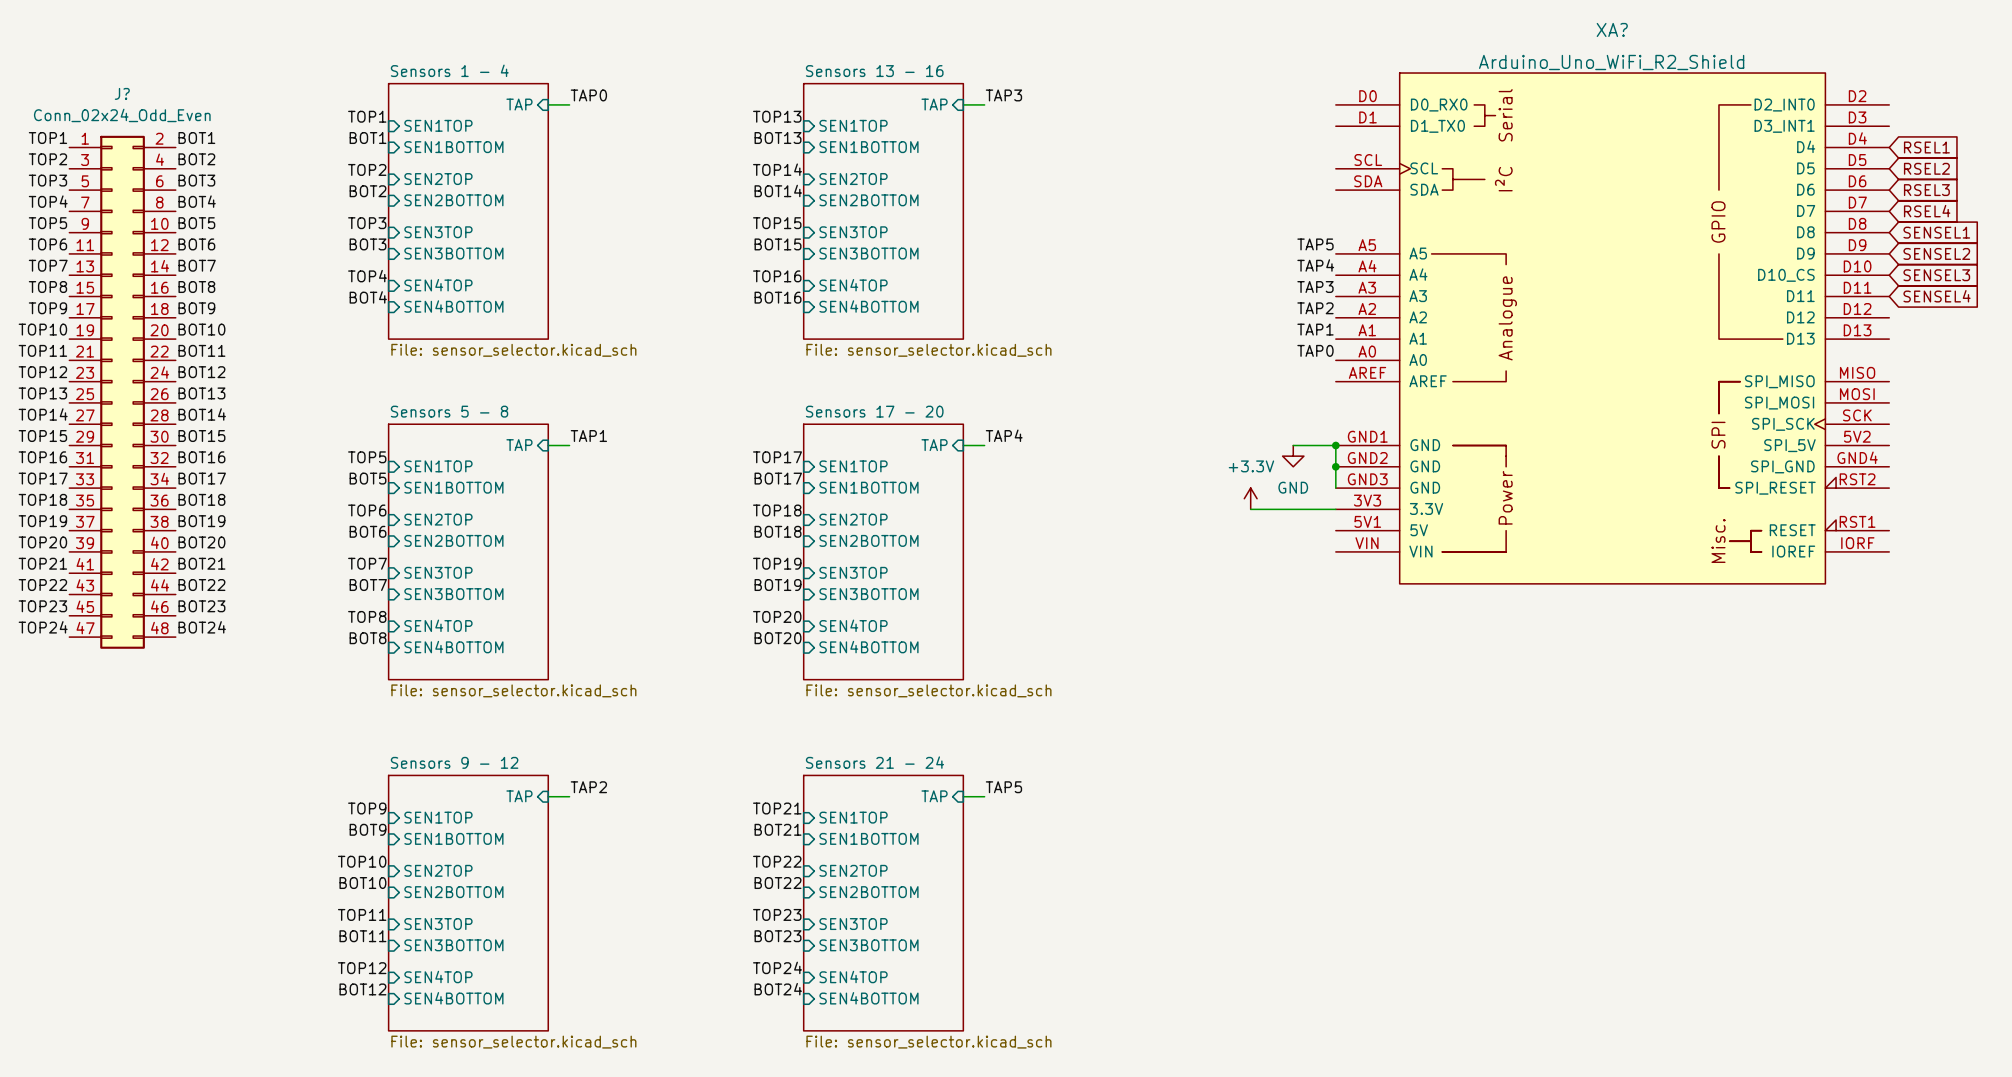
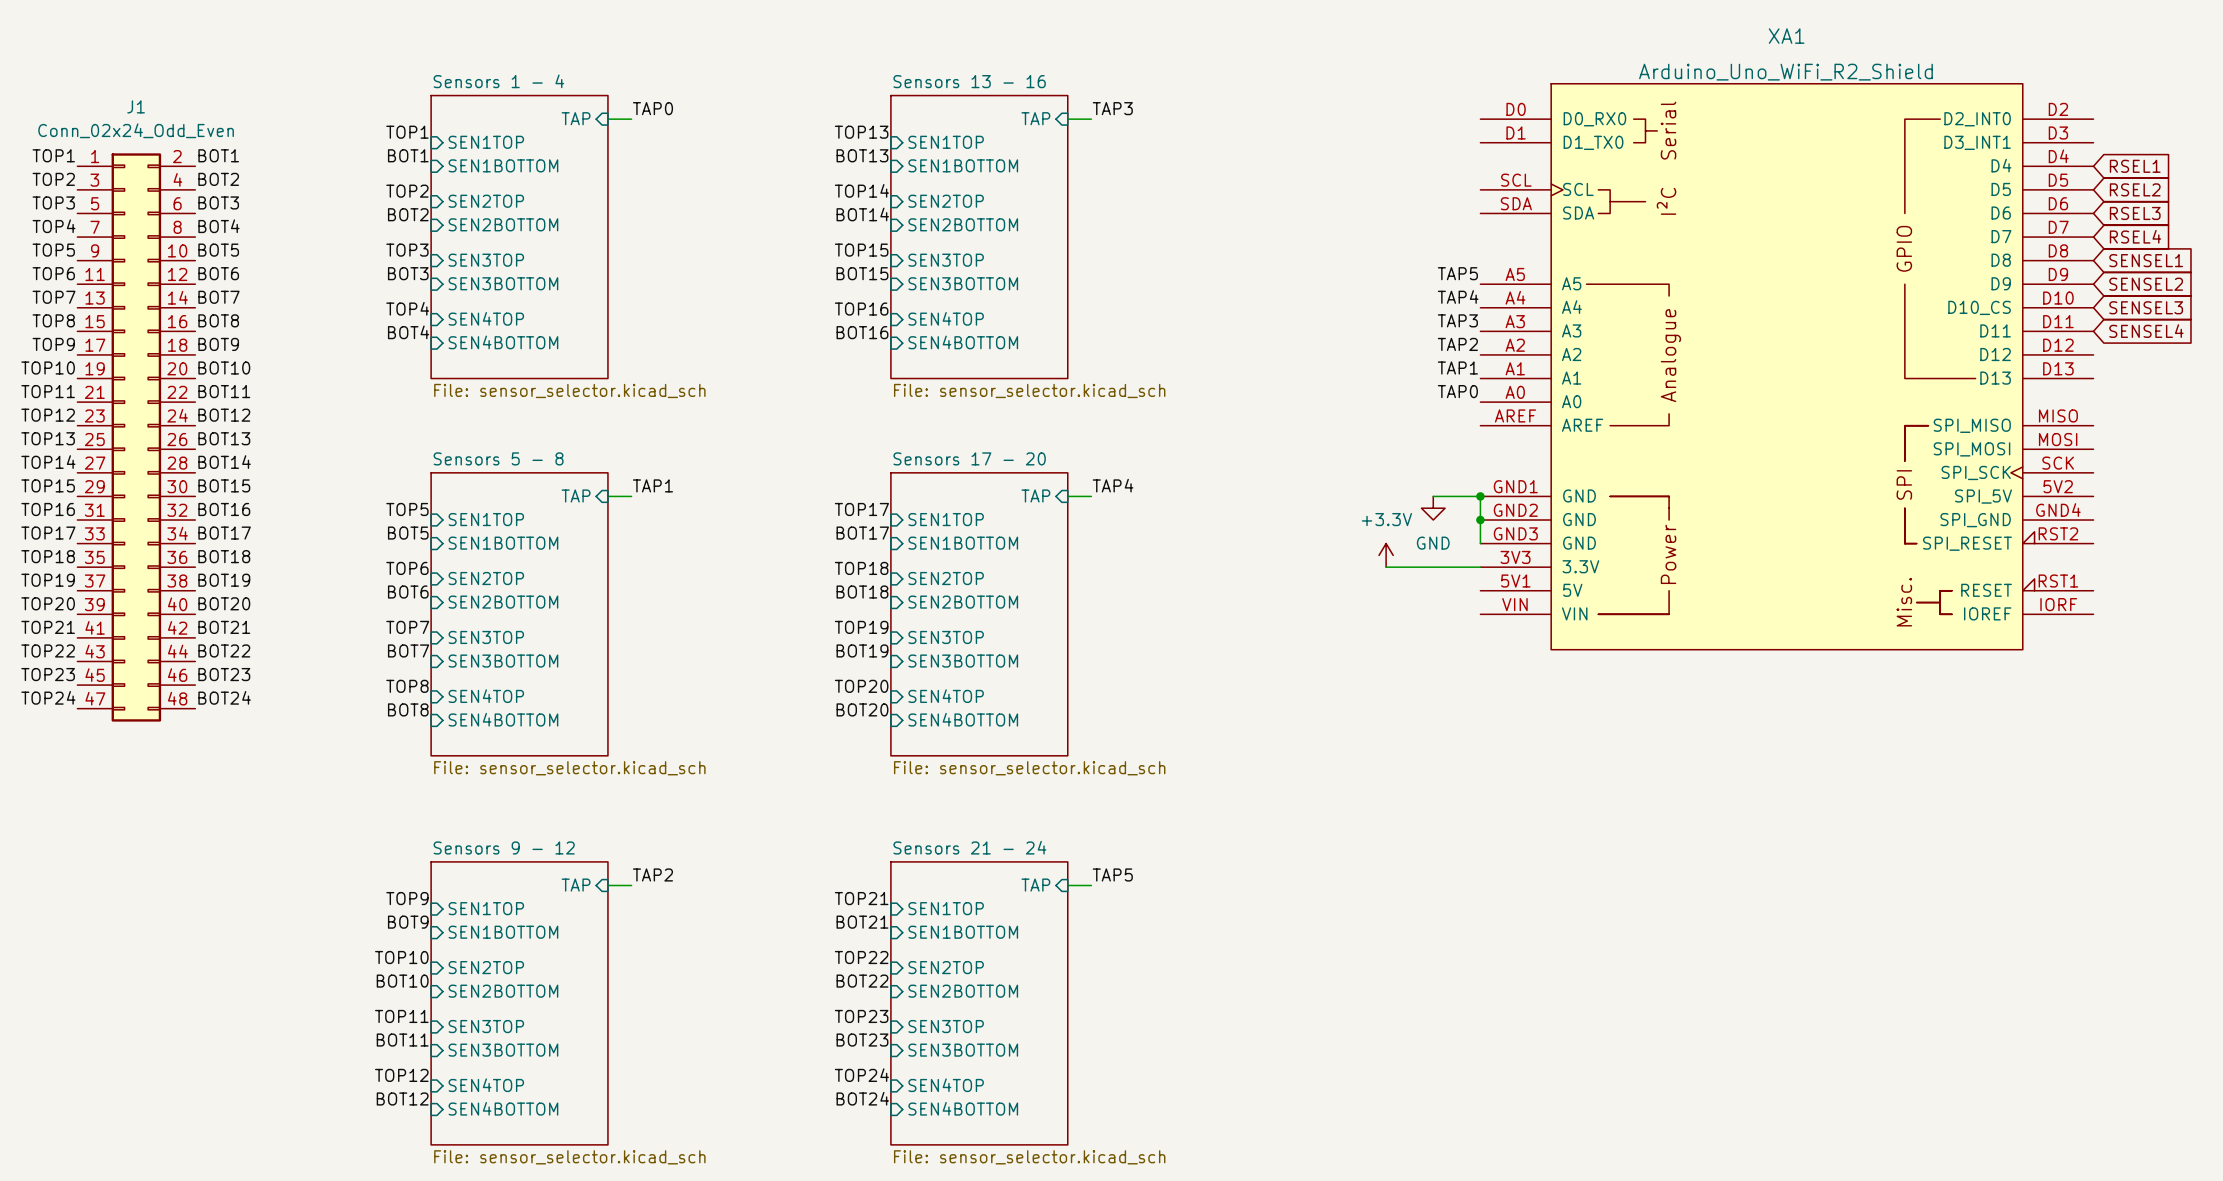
XA? name: XA? (1612, 29) -> XA1 (1786, 36)
J? name: J? (122, 93) -> J1 (136, 106)

